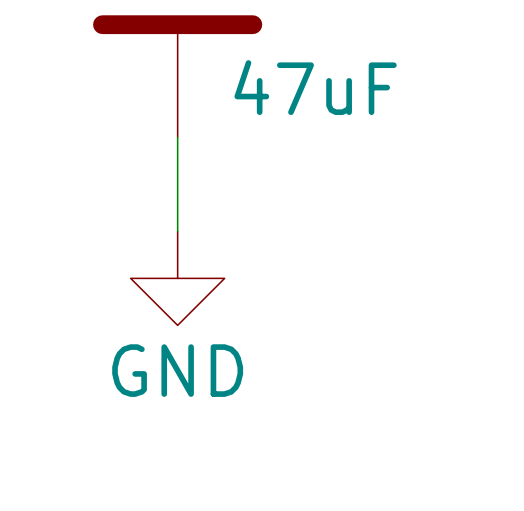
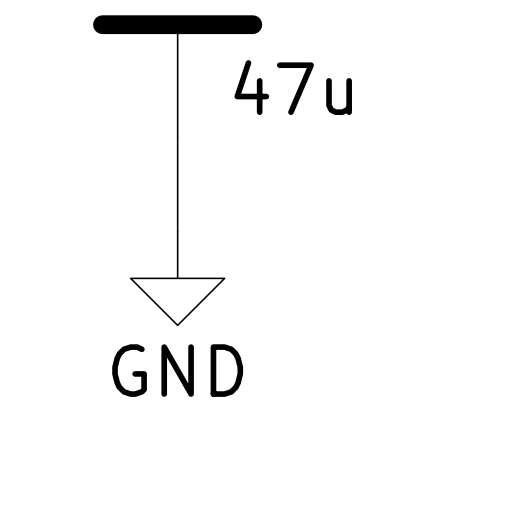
part value: 47uF (315, 87) -> 47u (293, 87)

